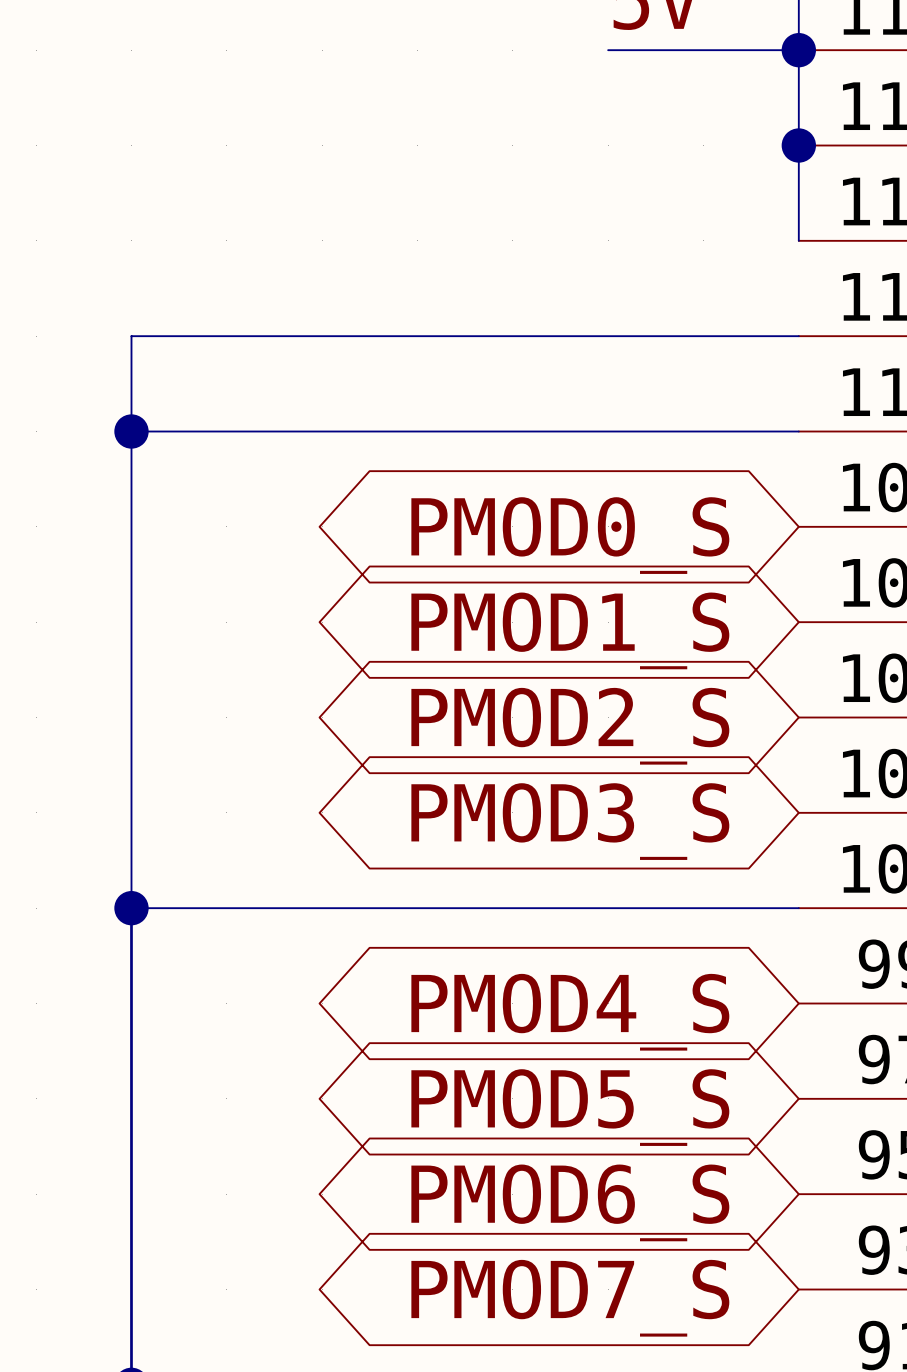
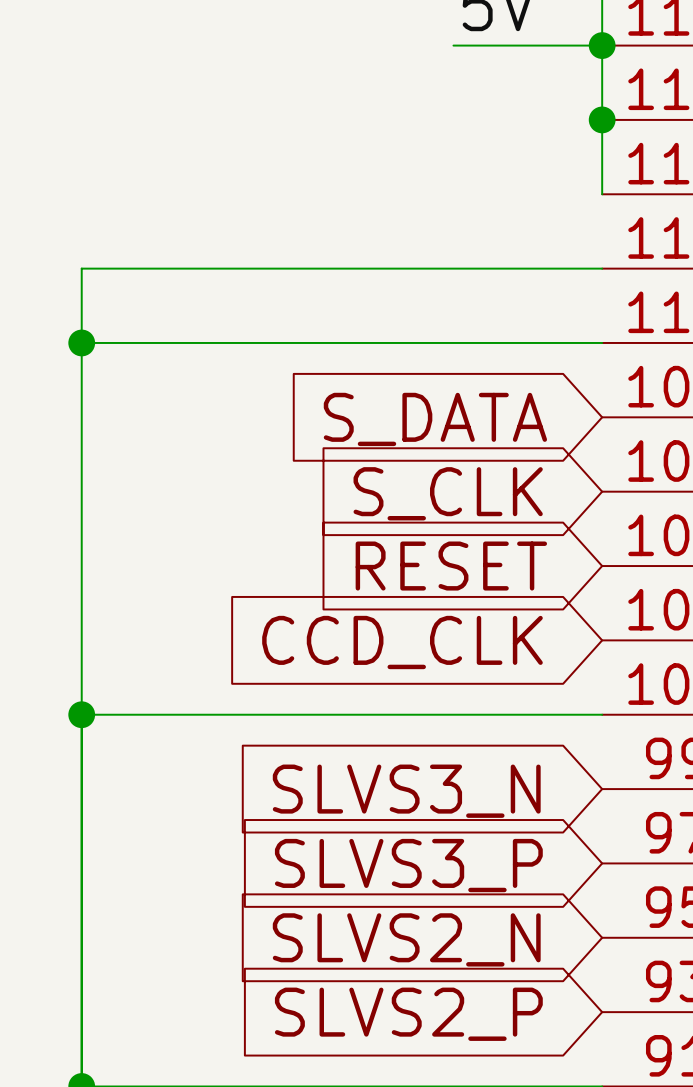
global label shape: bidirectional (570, 535) -> input (435, 419)
global label: PMOD0_S (570, 535) -> S_DATA (435, 419)
global label shape: bidirectional (570, 630) -> input (448, 493)
global label: PMOD1_S (570, 630) -> S_CLK (448, 493)
global label shape: bidirectional (570, 726) -> input (451, 566)
global label: PMOD2_S (570, 726) -> RESET (451, 566)
global label shape: bidirectional (570, 821) -> input (402, 642)
global label: PMOD3_S (570, 821) -> CCD_CLK (402, 642)
global label shape: bidirectional (570, 1012) -> input (406, 791)
global label: PMOD4_S (570, 1012) -> SLVS3_N (406, 791)
global label shape: bidirectional (570, 1107) -> input (408, 865)
global label: PMOD5_S (570, 1107) -> SLVS3_P (408, 865)
global label shape: bidirectional (570, 1202) -> input (406, 939)
global label: PMOD6_S (570, 1202) -> SLVS2_N (406, 939)
global label shape: bidirectional (570, 1298) -> input (408, 1014)
global label: PMOD7_S (570, 1298) -> SLVS2_P (408, 1014)

